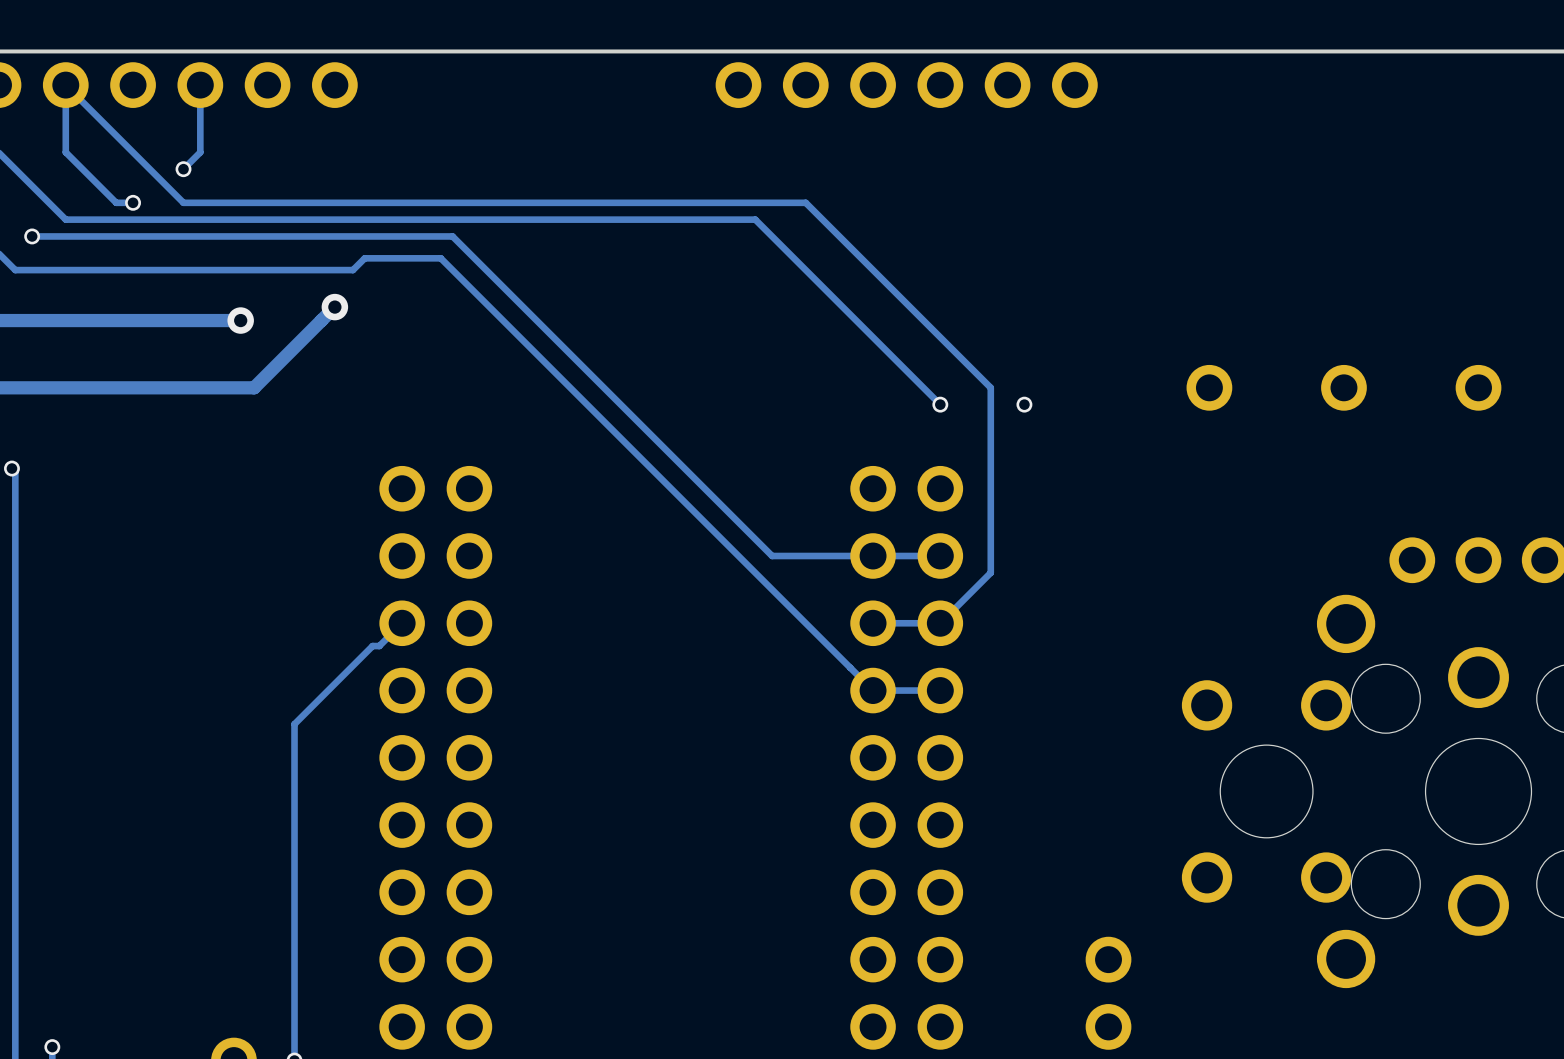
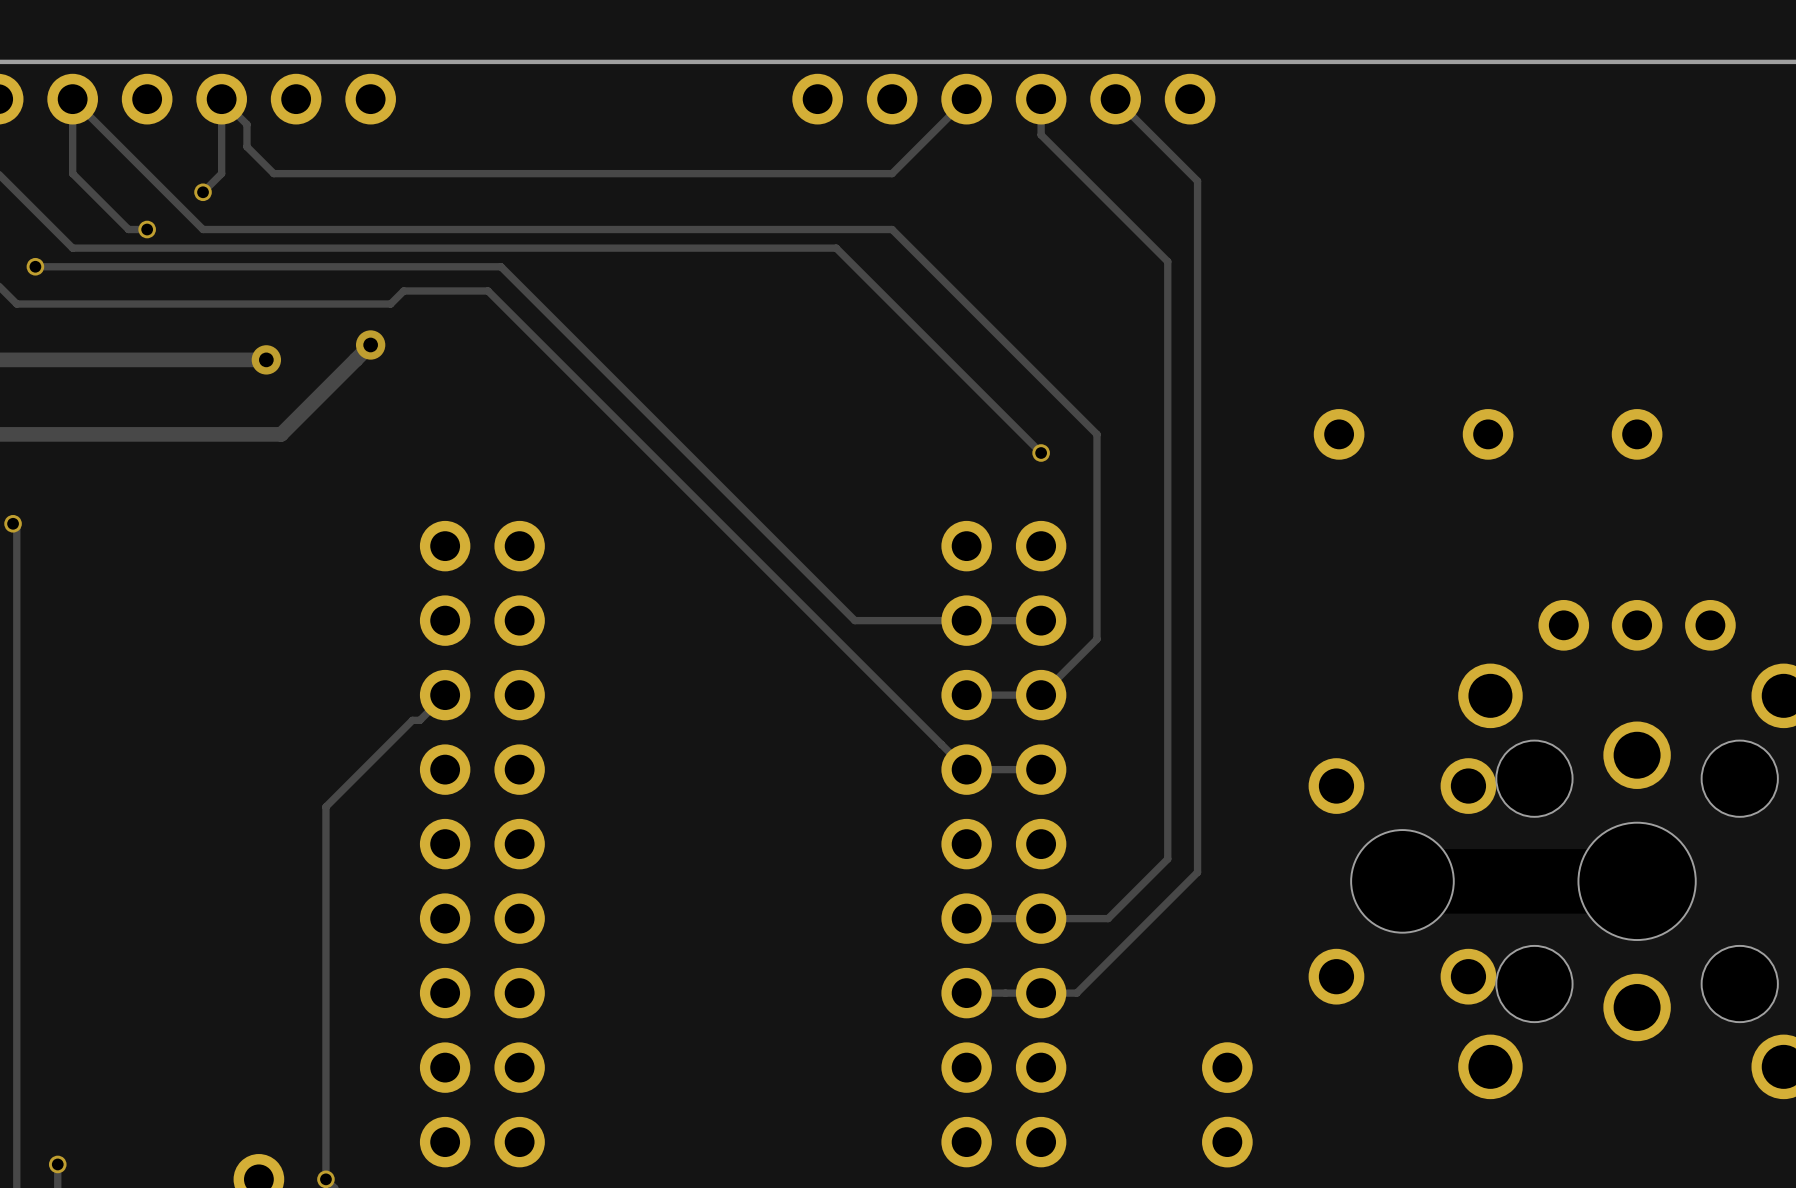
track: none -> (966, 99) (892, 173) (273, 173) (246, 146) (246, 124) (221, 99)
track: none -> (1041, 99) (1041, 134) (1167, 261) (1167, 859) (1108, 918) (966, 918)
track: none -> (1115, 99) (1197, 181) (1197, 872) (1076, 993) (966, 993)
via: (1024, 404) -> none

